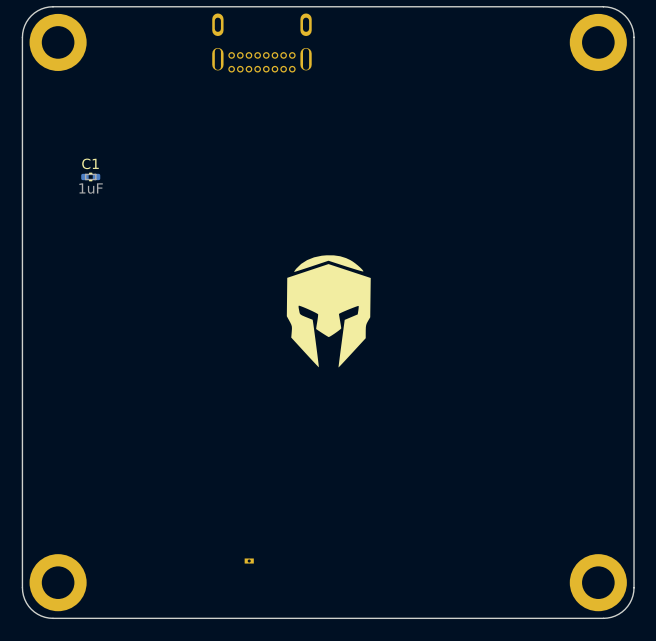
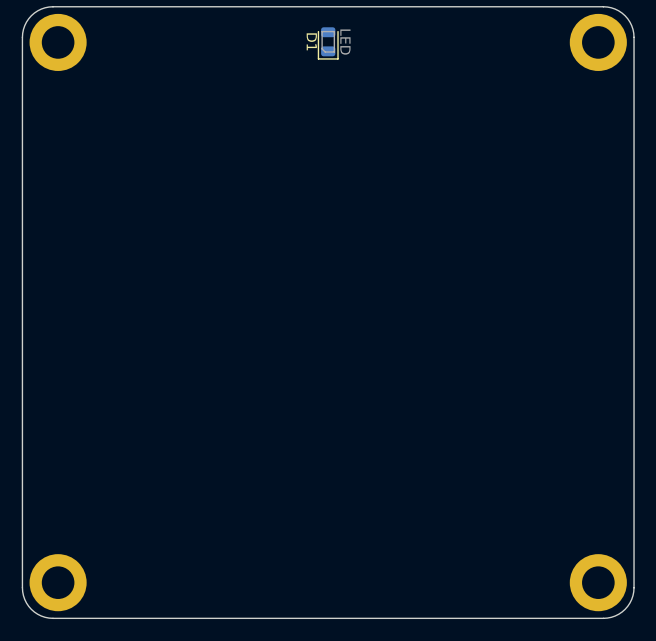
part: (261, 42) -> none
D1: none -> LED (328, 43)
C1: 1uF (90, 176) -> none
drawing: [286, 255, 371, 368] -> none
part: (249, 561) -> none

